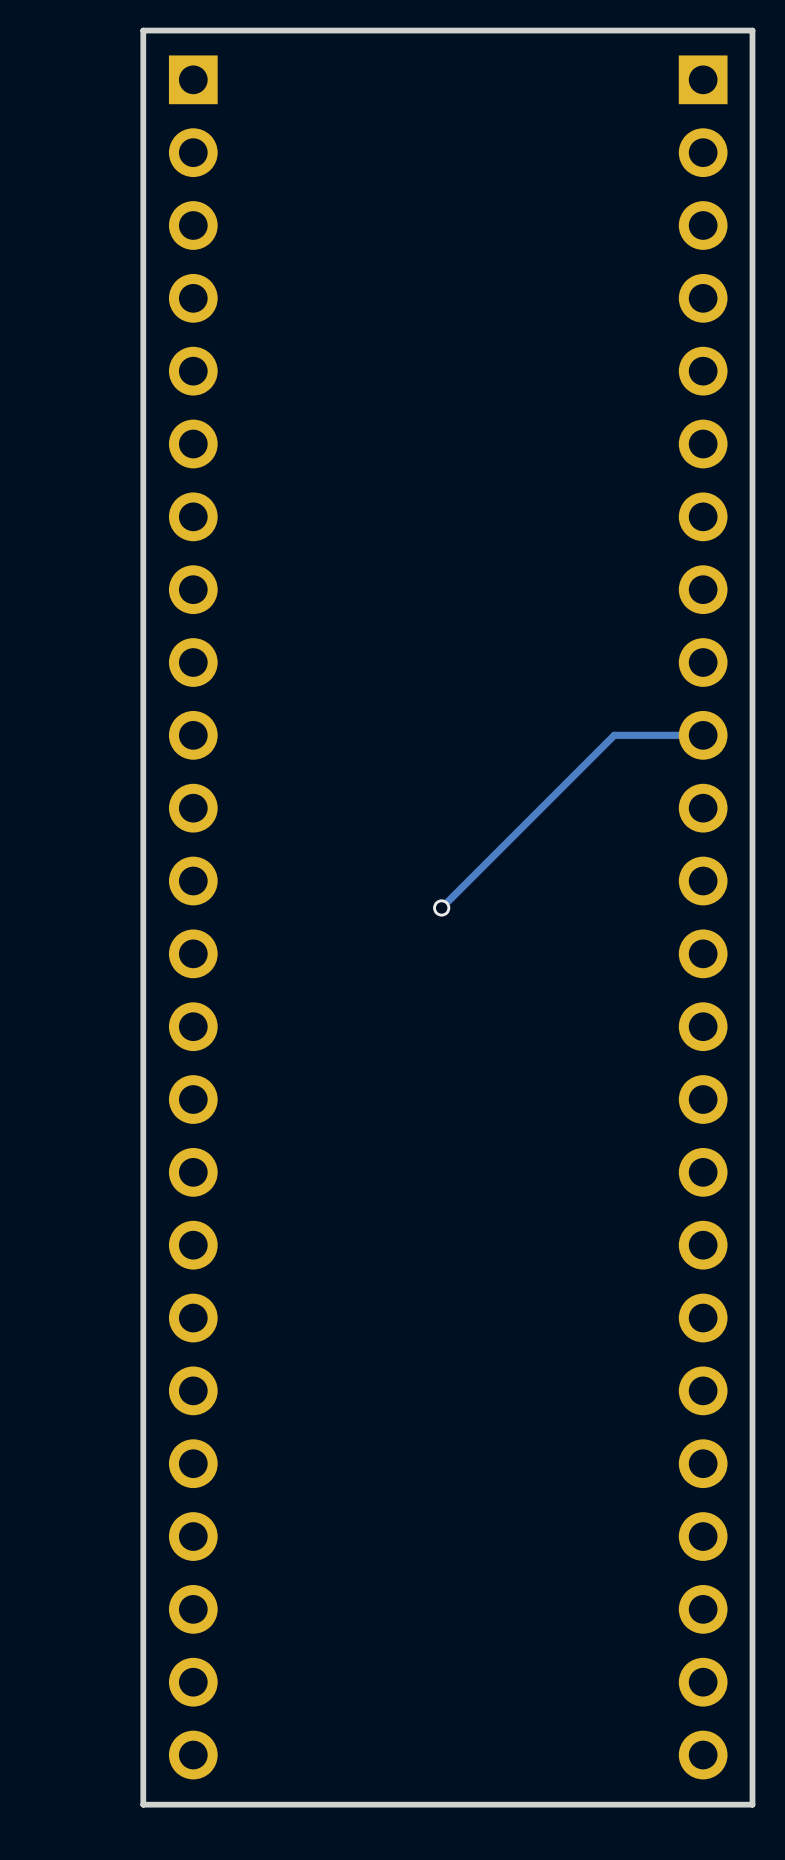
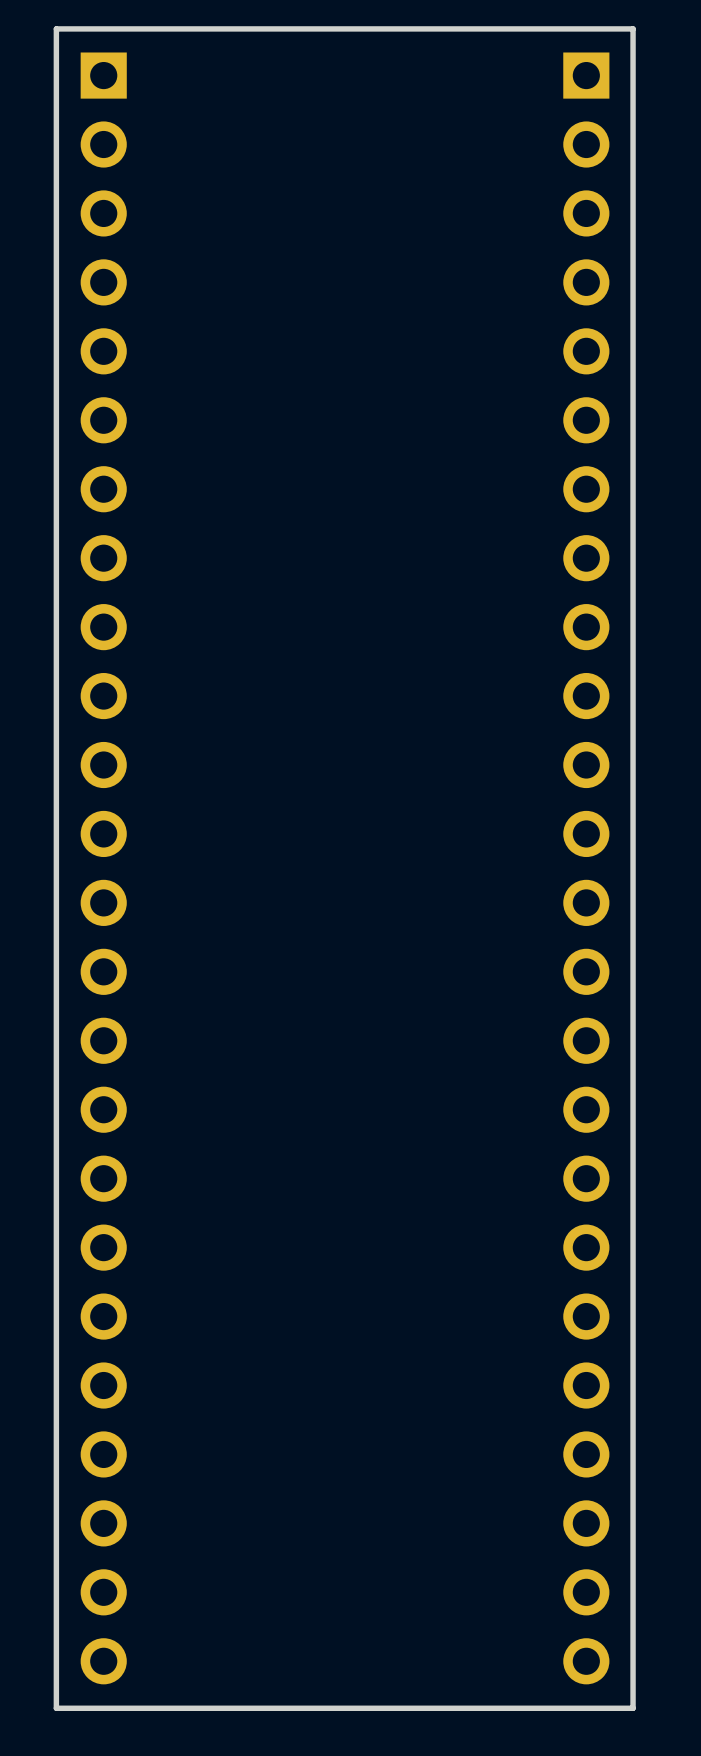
track: (703, 735) (614, 735) (441, 907) -> none
via: (441, 907) -> none

